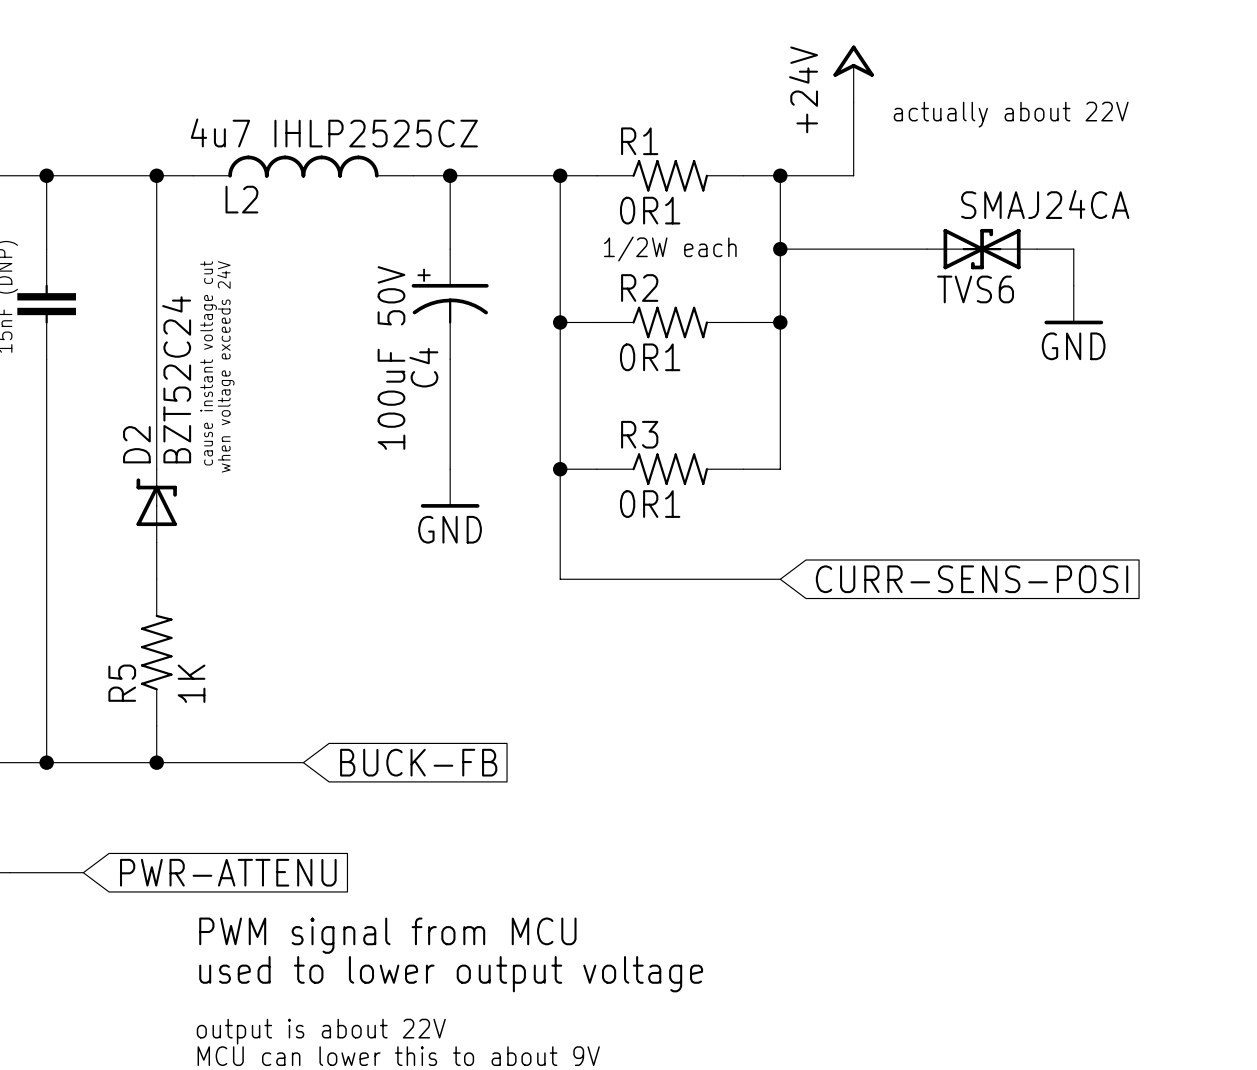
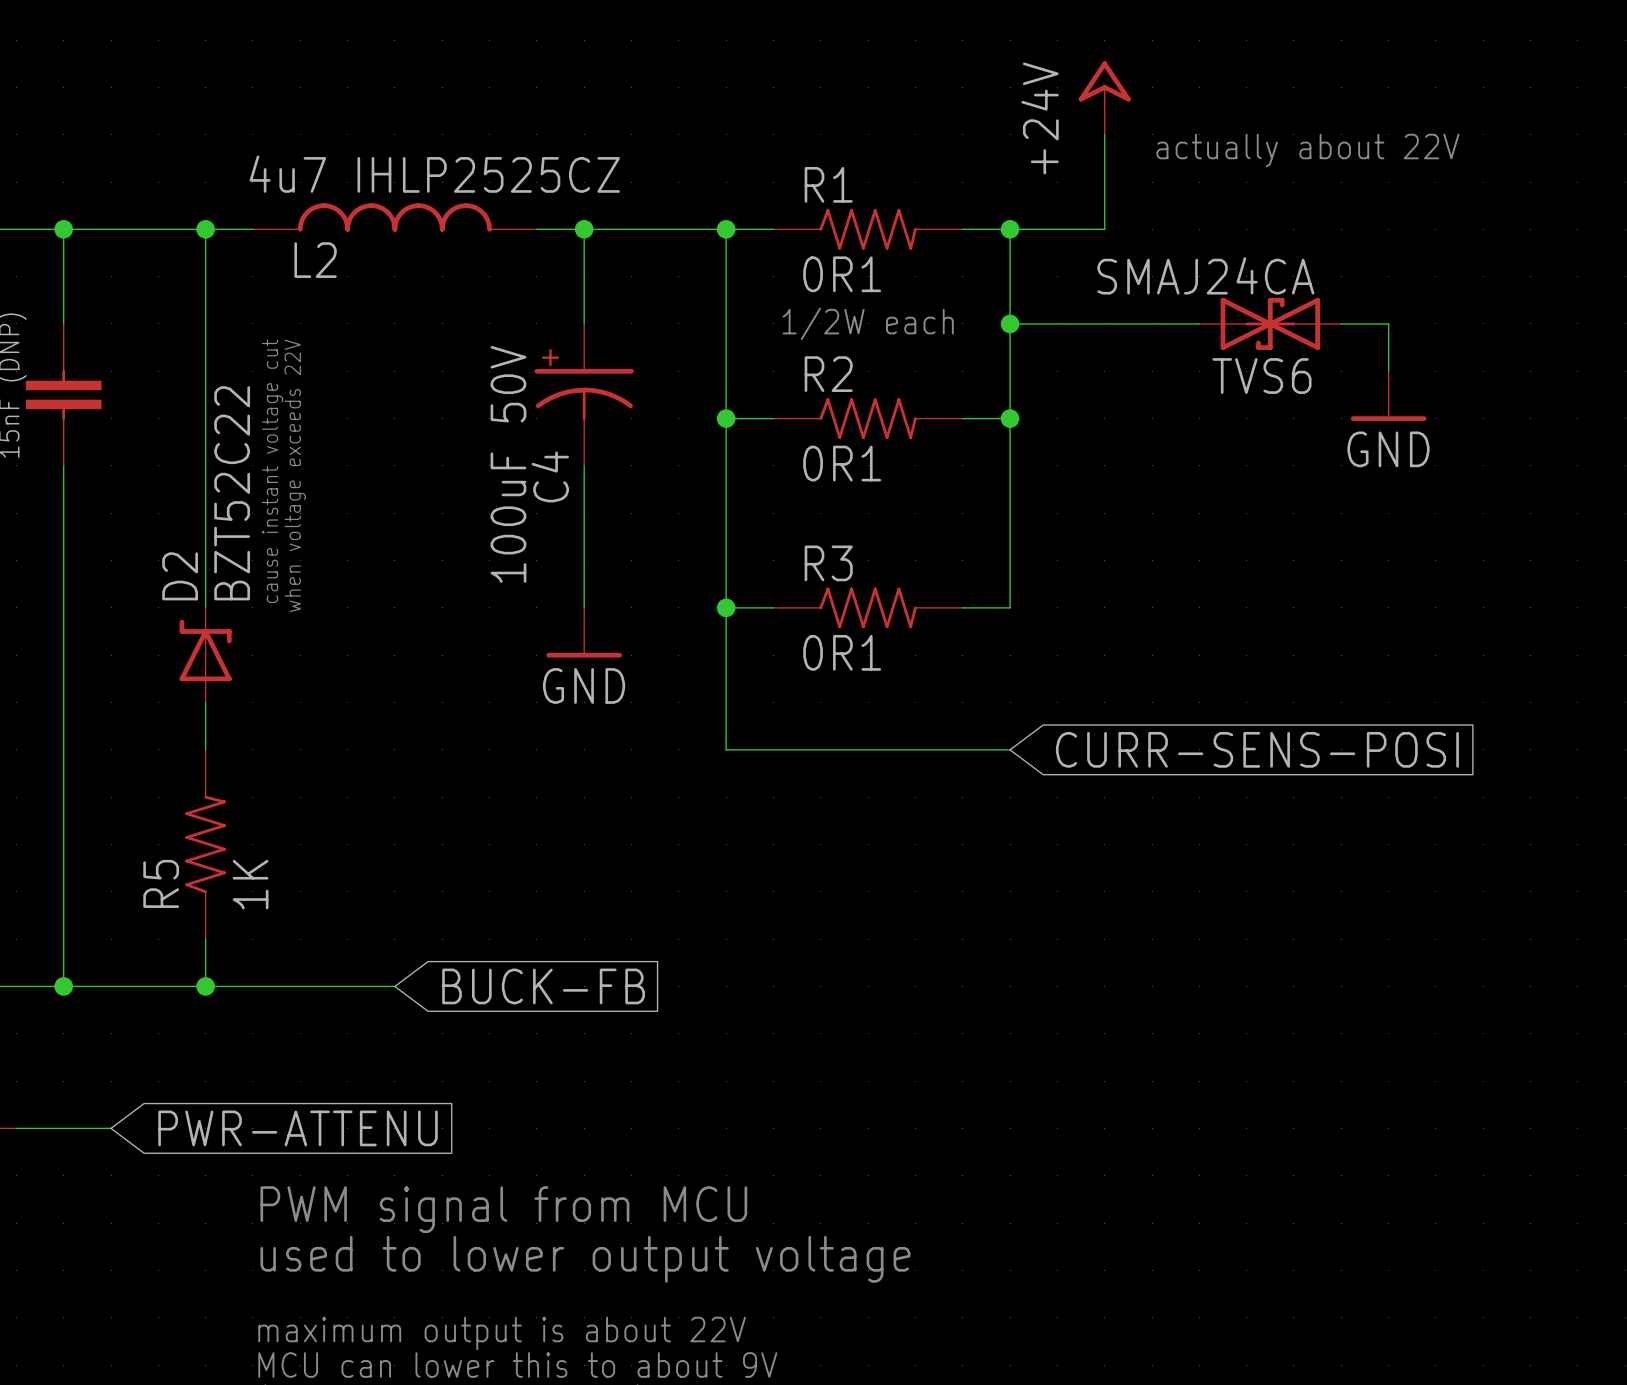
TVS6 value position: SMAJ24CA (1045, 204) -> SMAJ24CA (1205, 275)
text: when voltage exceeds 24V (225, 366) -> when voltage exceeds 22V (295, 475)
D2 value: BZT52C24 (176, 379) -> BZT52C22 (232, 493)
text: output is about 22V (321, 1031) -> maximum output is about 22V (502, 1333)

